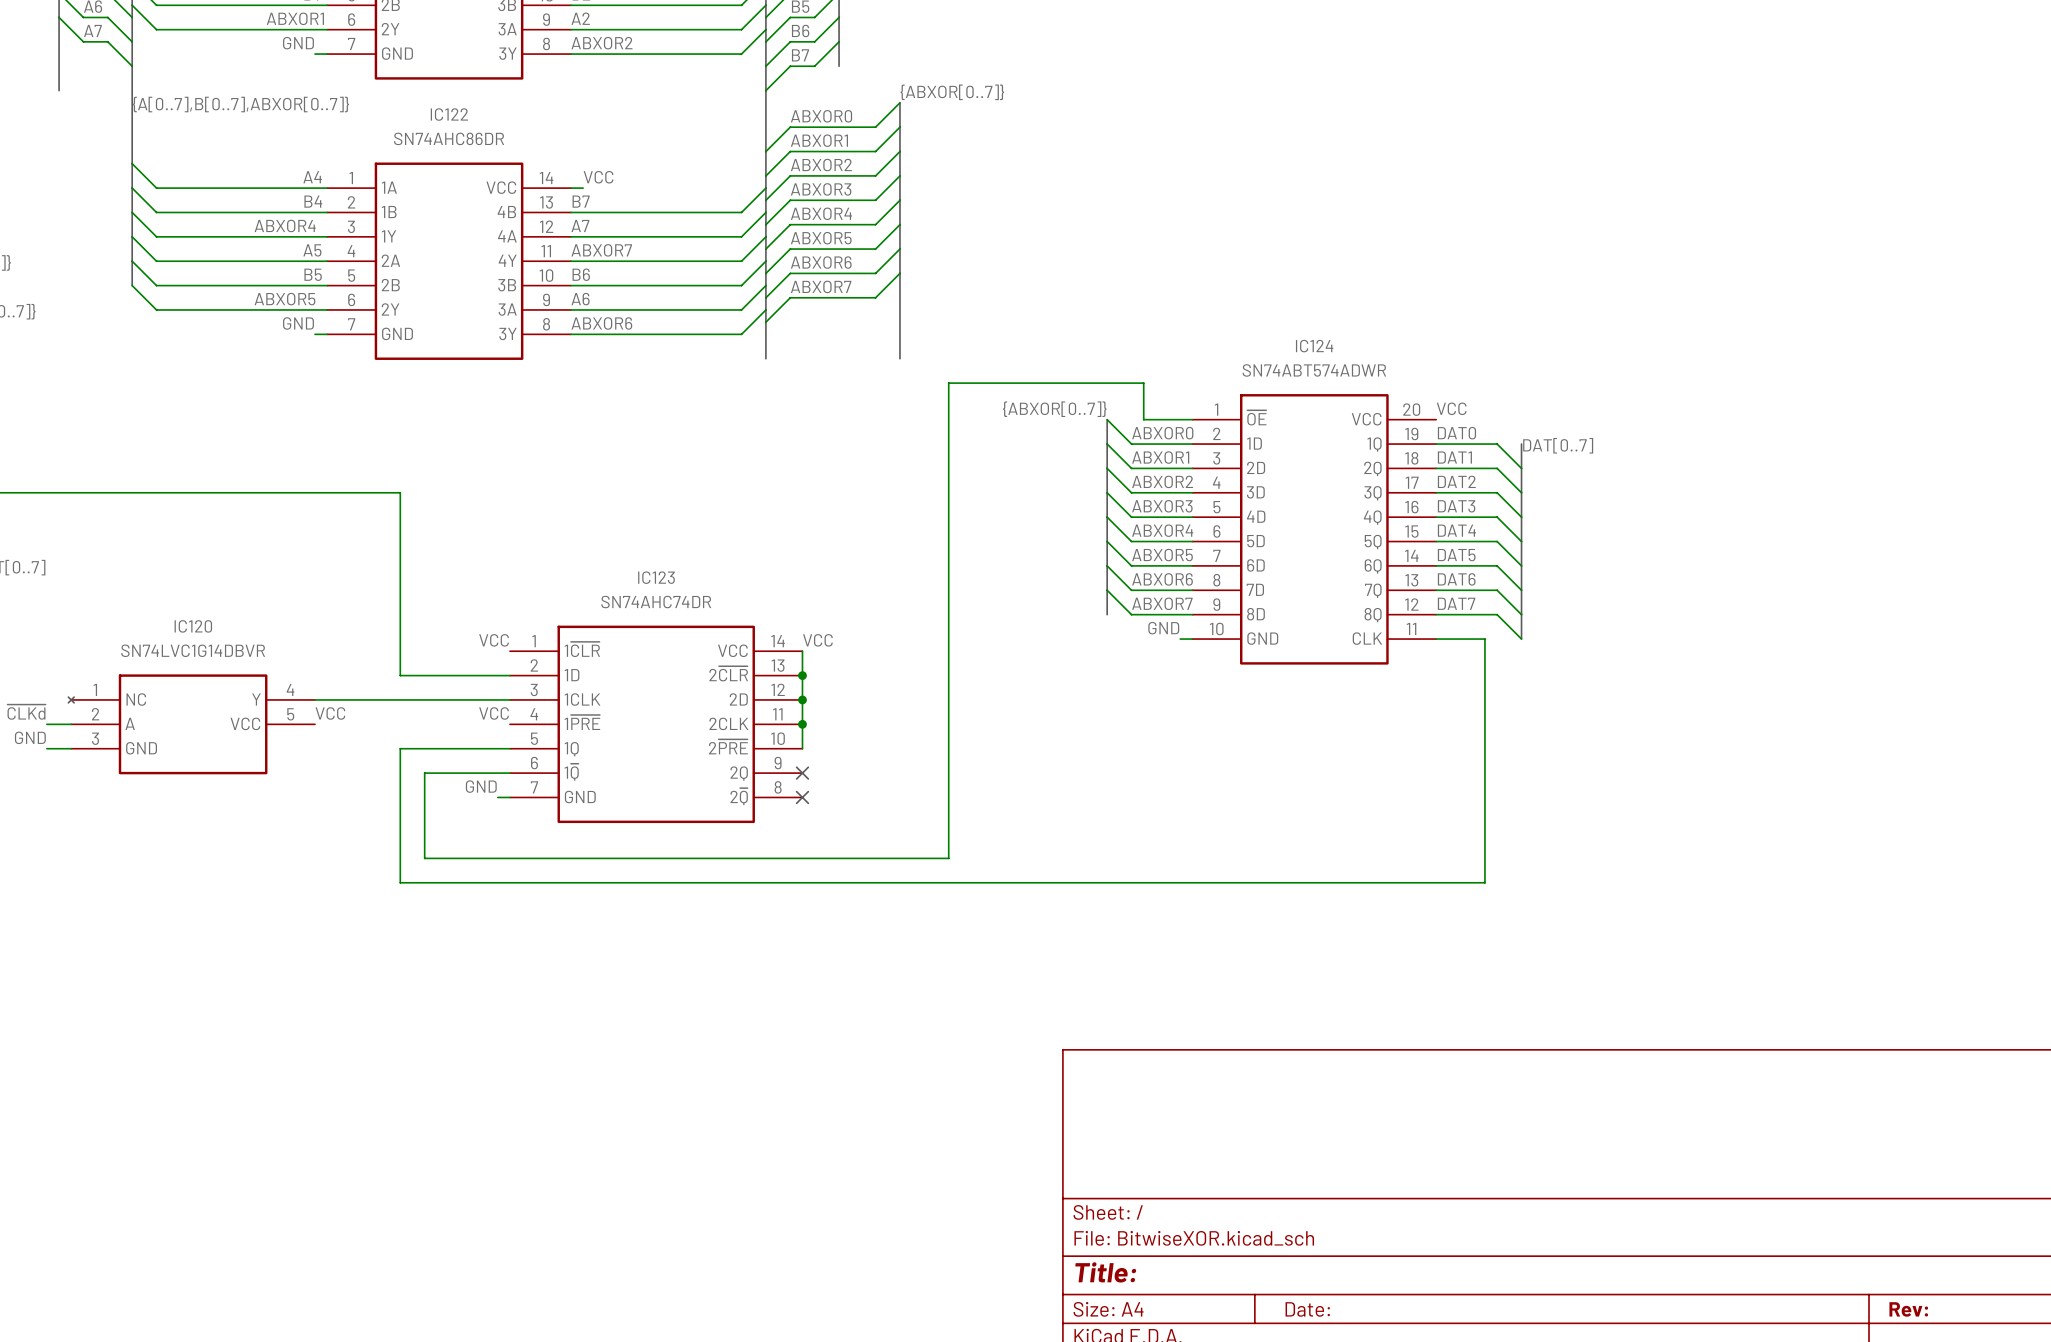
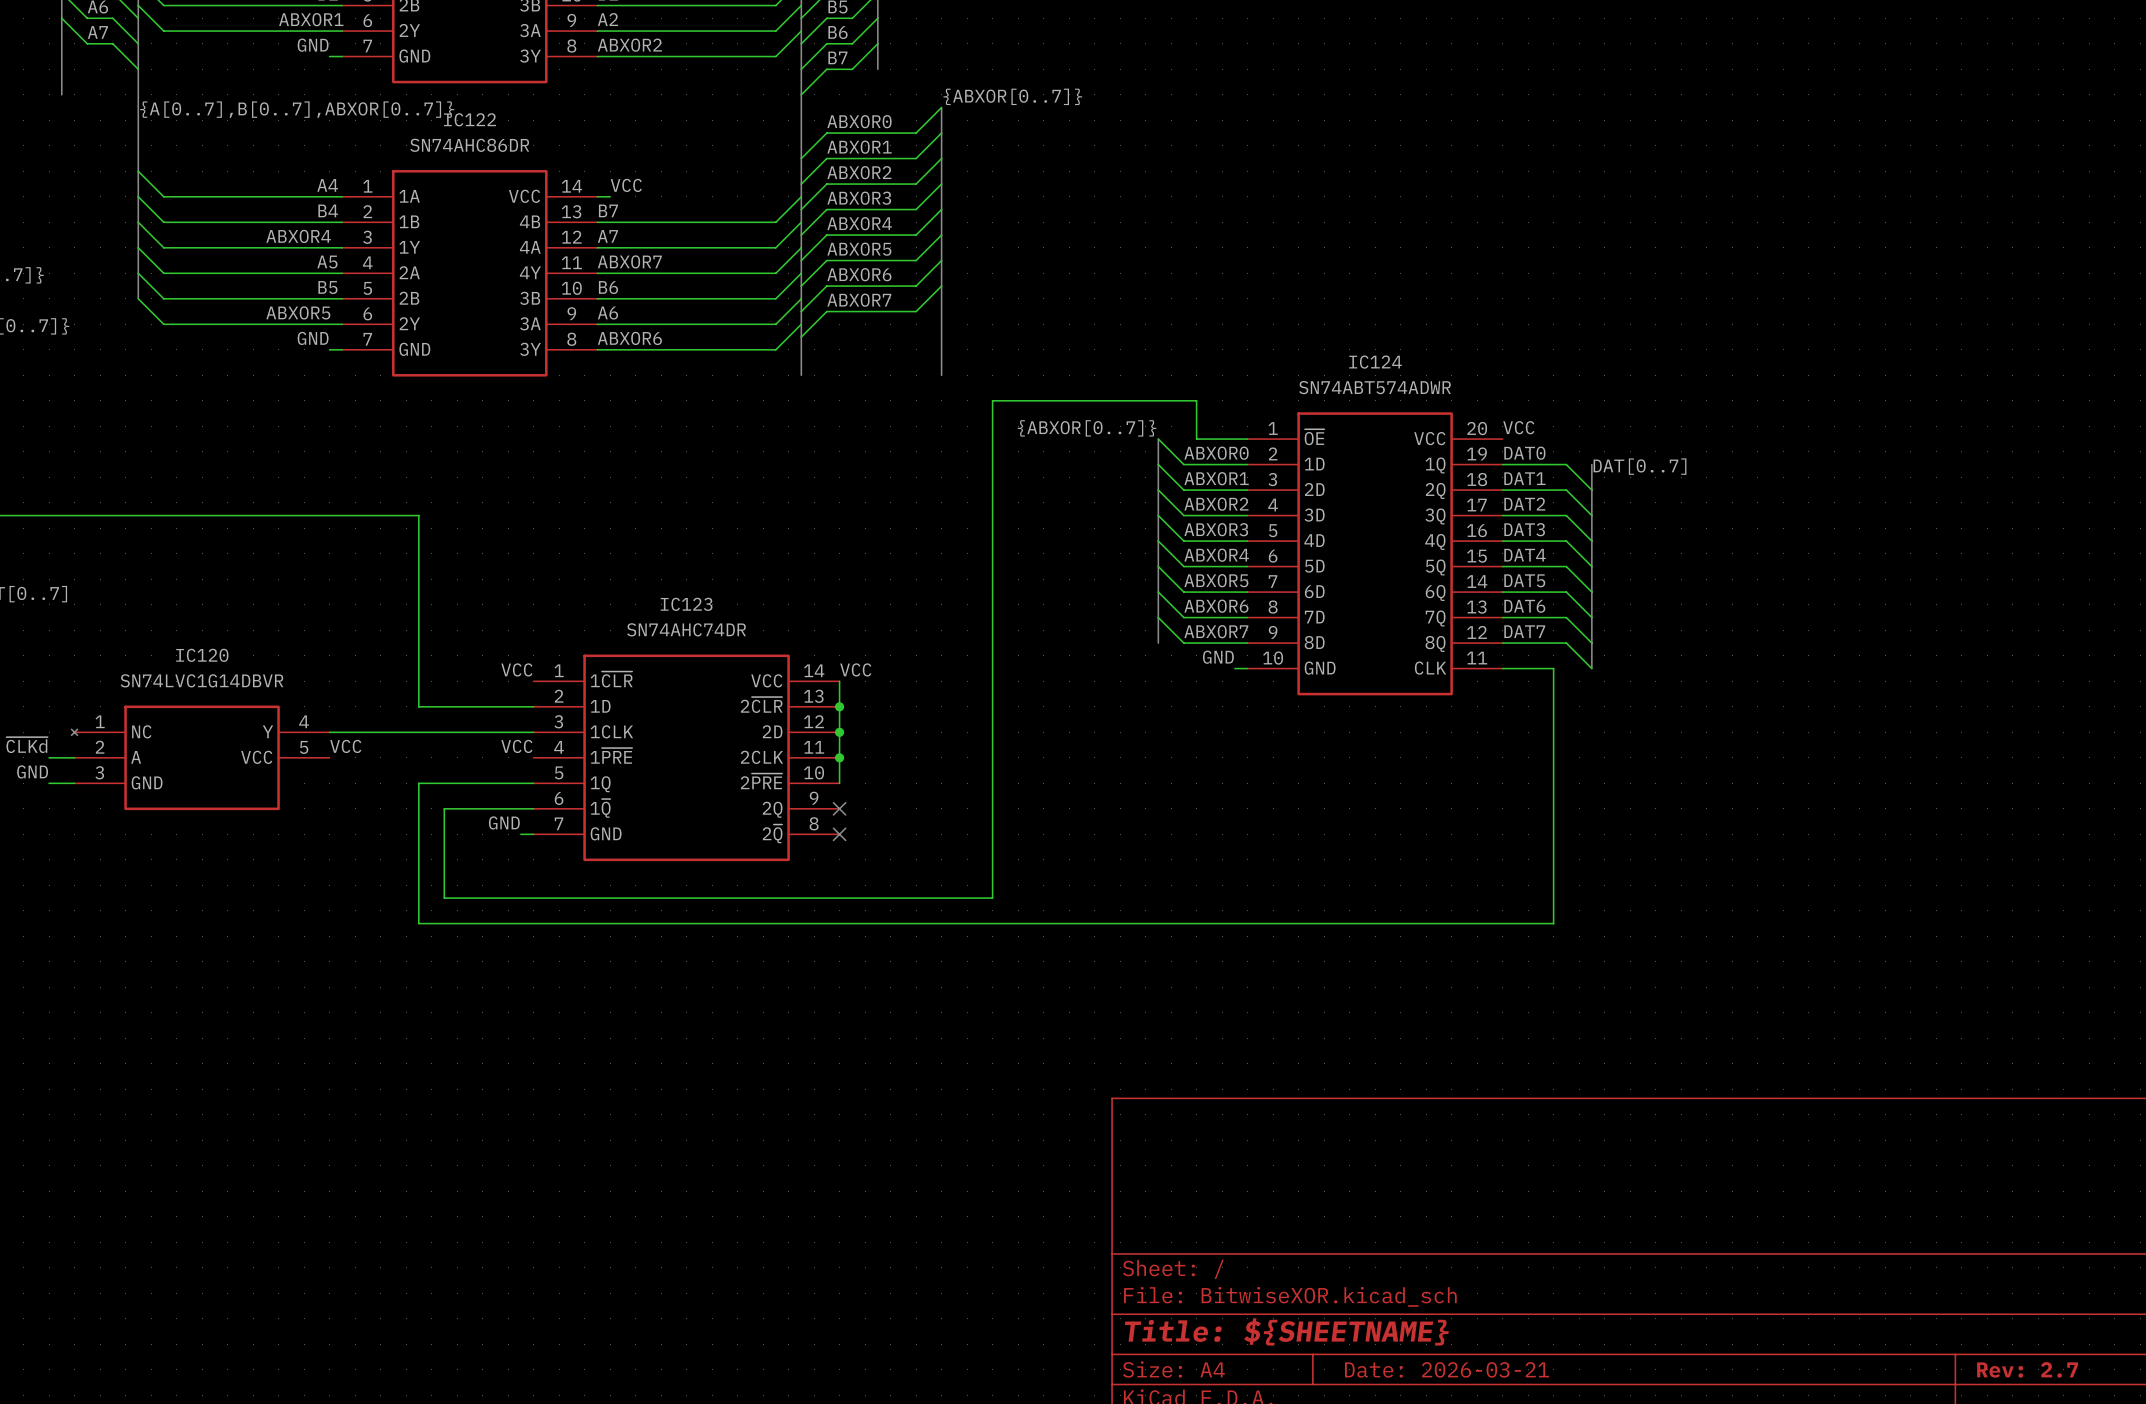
title block: Title: (1105, 1272) -> Title: ${SHEETNAME} (1286, 1331)
title block: Date: (1307, 1309) -> Date: 2026-03-21 (1447, 1369)
title block: Rev: (1908, 1309) -> Rev: 2.7 (2027, 1369)

